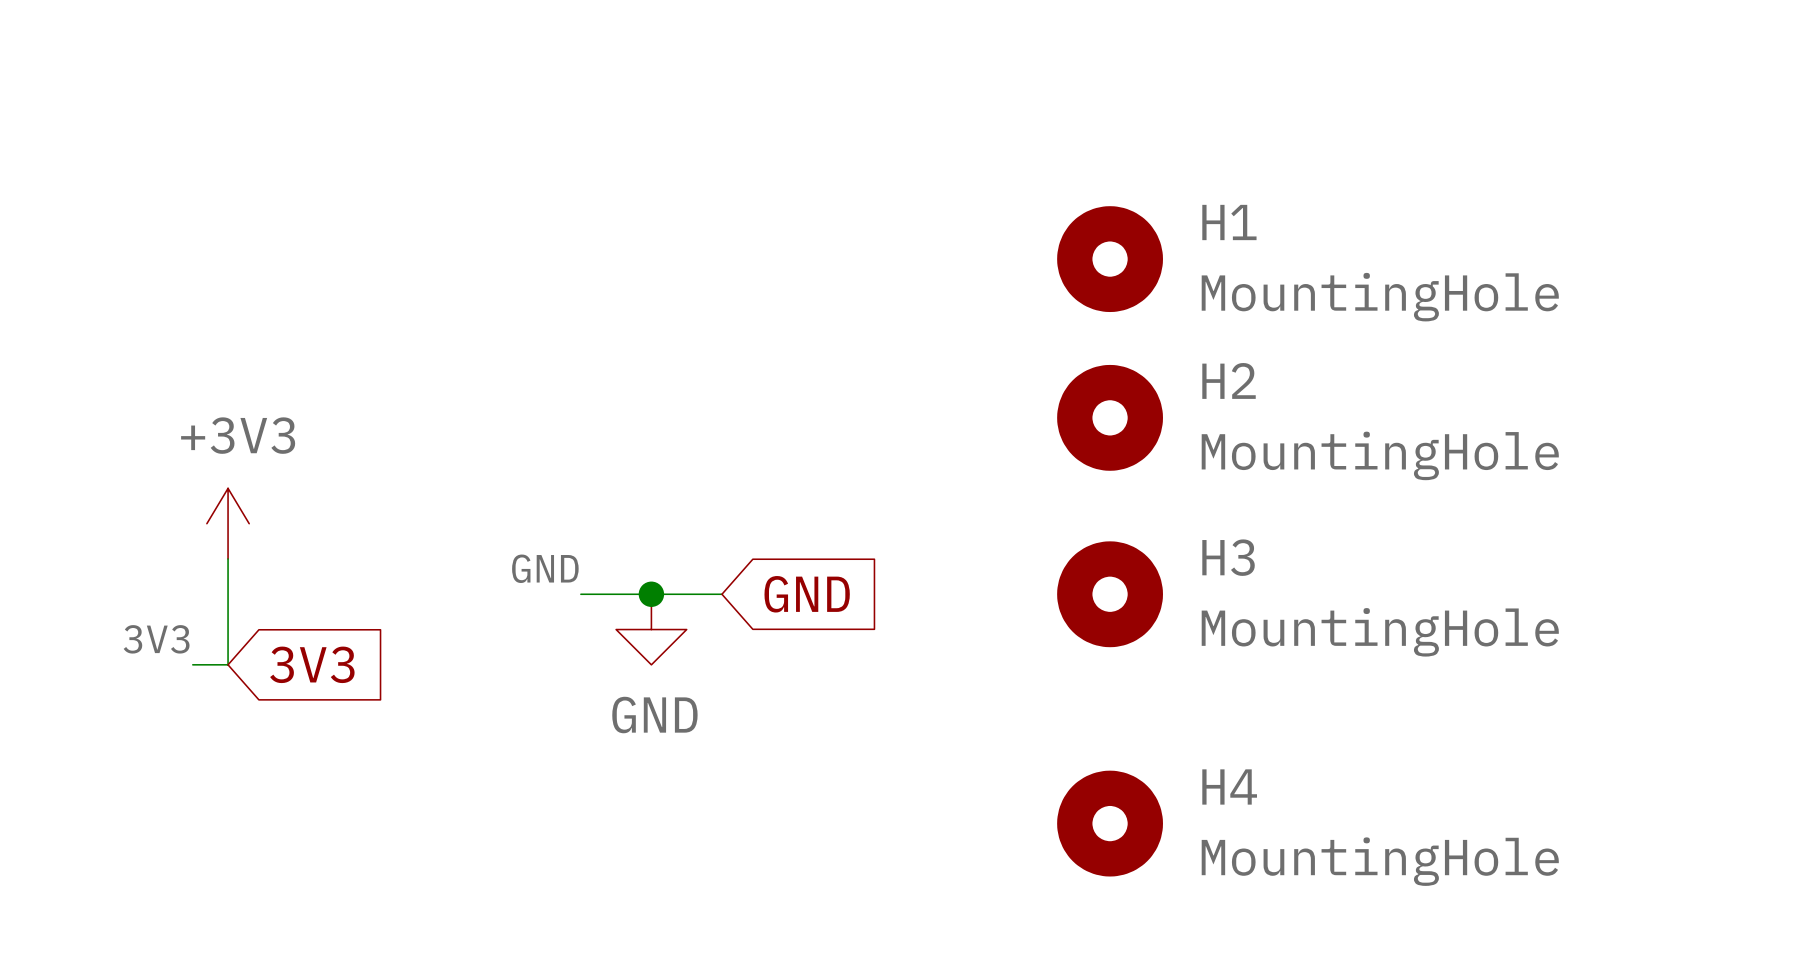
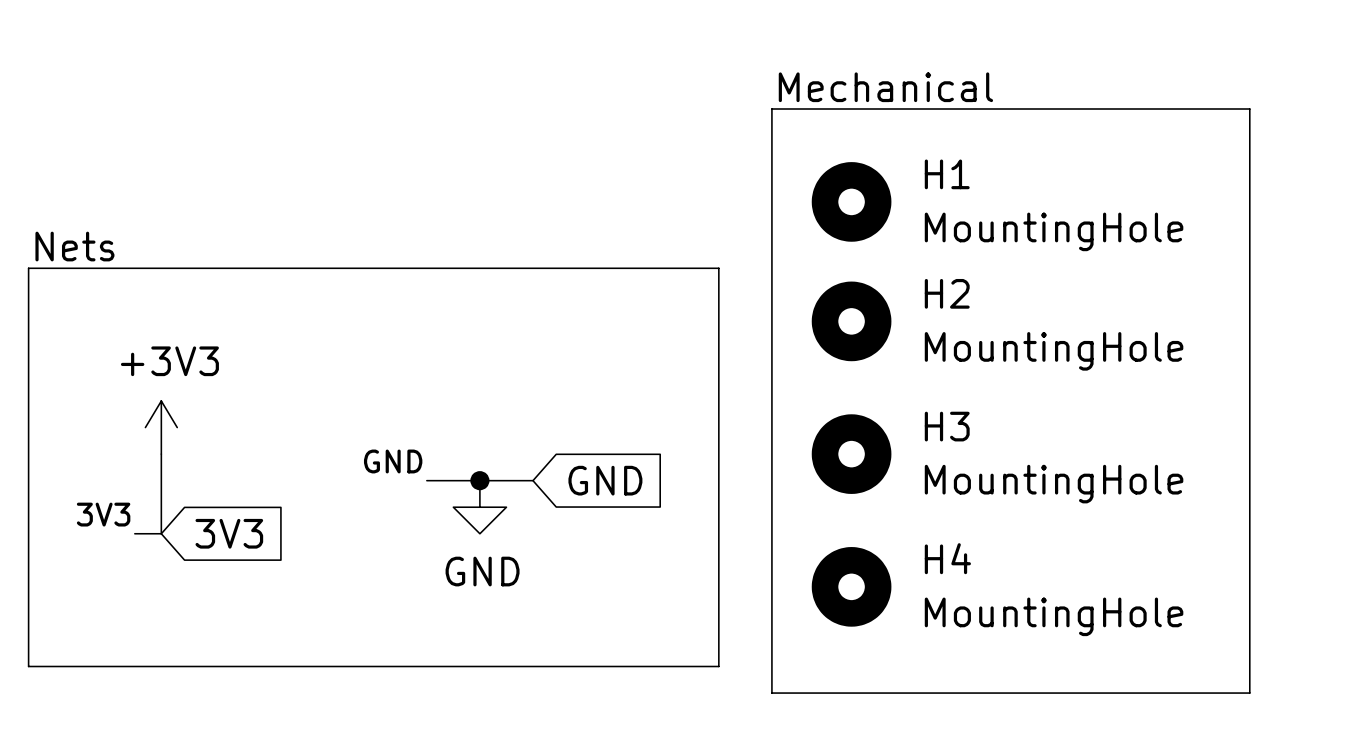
text: none -> Mechanical (885, 87)
line: none -> (771, 109) (1249, 109) (1249, 693) (771, 693) (771, 109)
H1 position: (1110, 259) -> (851, 201)
text: none -> Nets (74, 246)
line: none -> (28, 268) (718, 268) (718, 666) (28, 666) (28, 268)
H2 position: (1110, 417) -> (851, 321)
H3 position: (1110, 594) -> (851, 454)
H4 position: (1110, 823) -> (851, 586)

